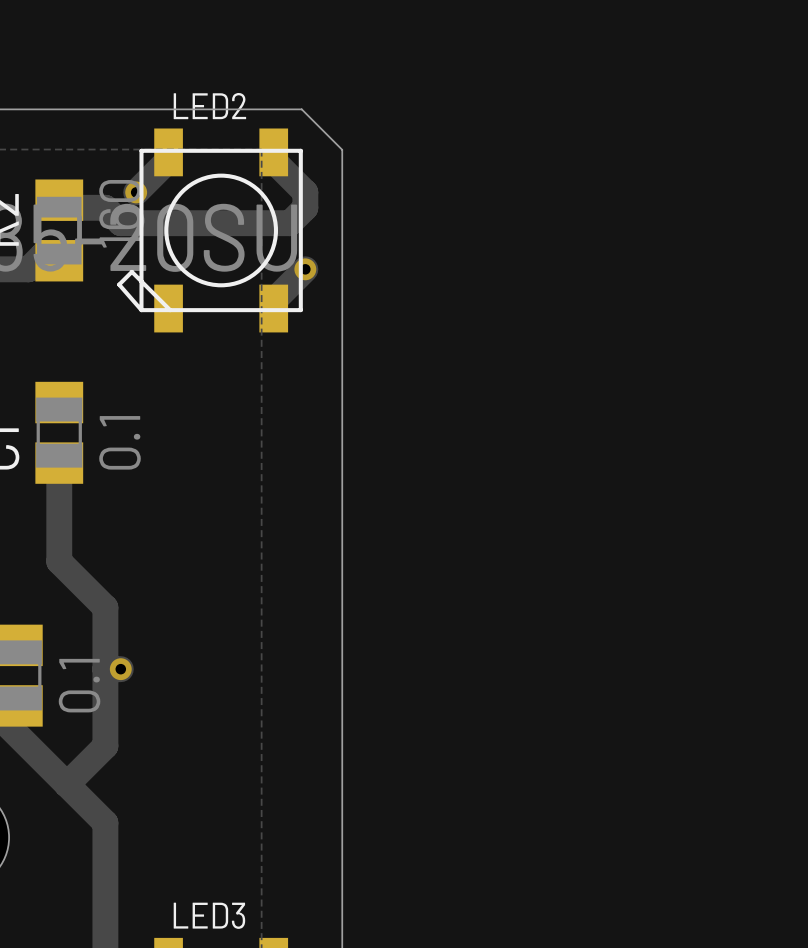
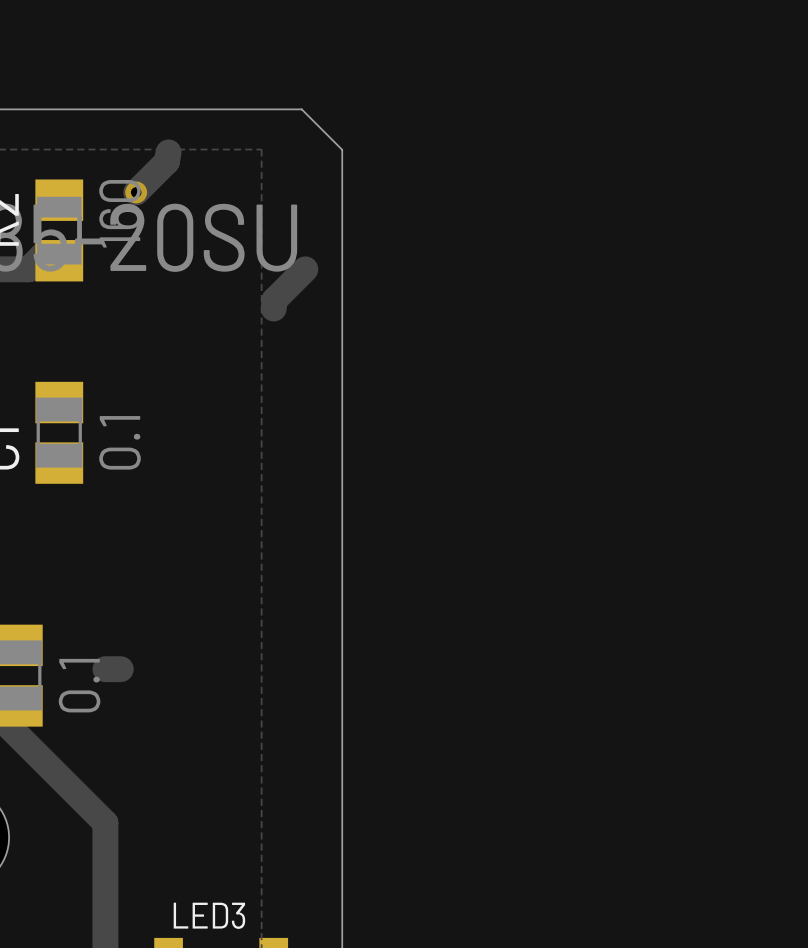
track: (273, 152) (274, 161) (305, 192) (305, 207) (289, 223) (120, 223) (105, 207) (59, 207) (59, 200) -> none
LED2: (210, 230) -> none
via: (305, 269) -> none
track: (59, 463) (59, 561) (105, 607) (105, 746) (66, 784) -> none
via: (120, 669) -> none

